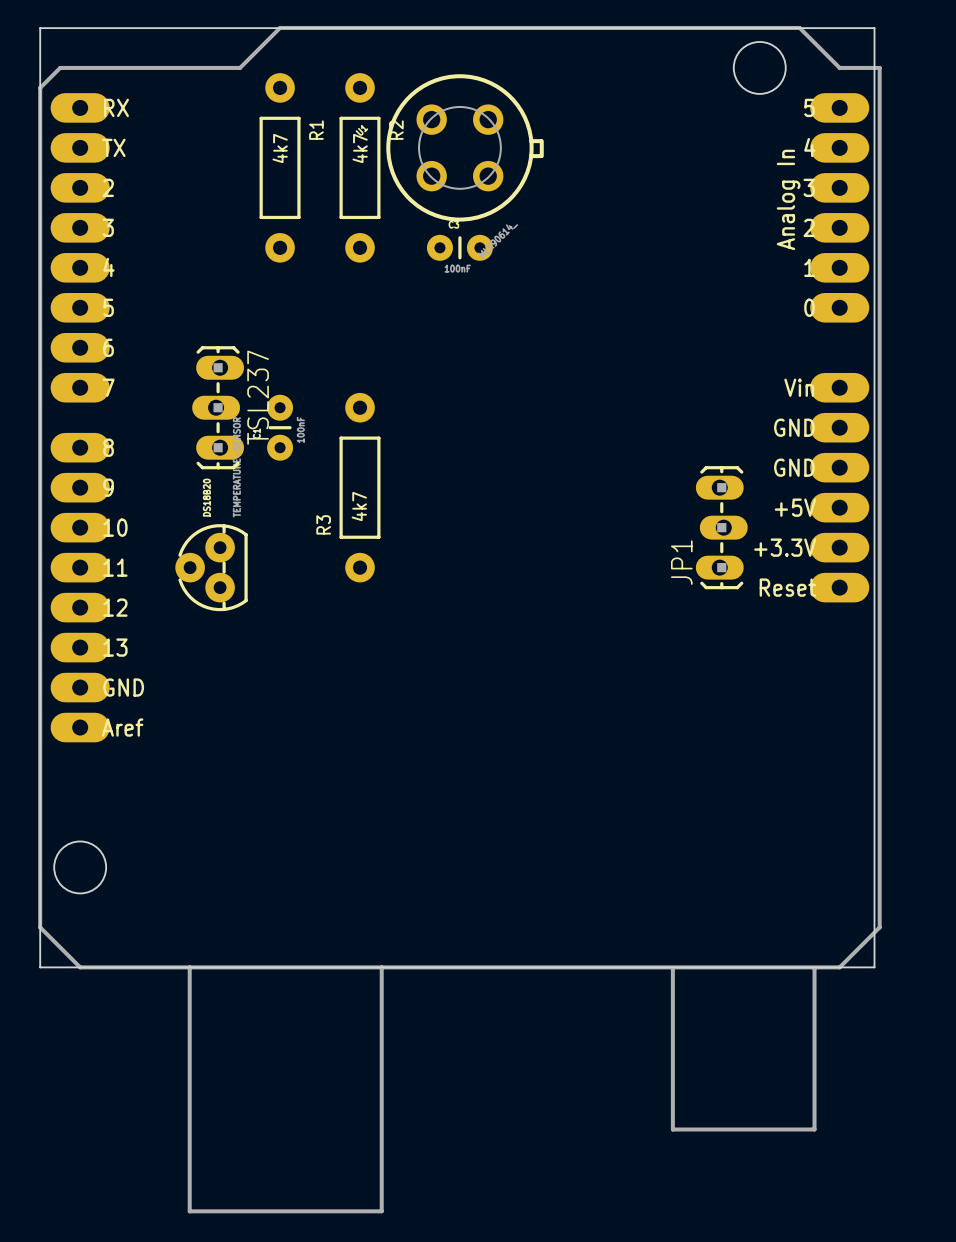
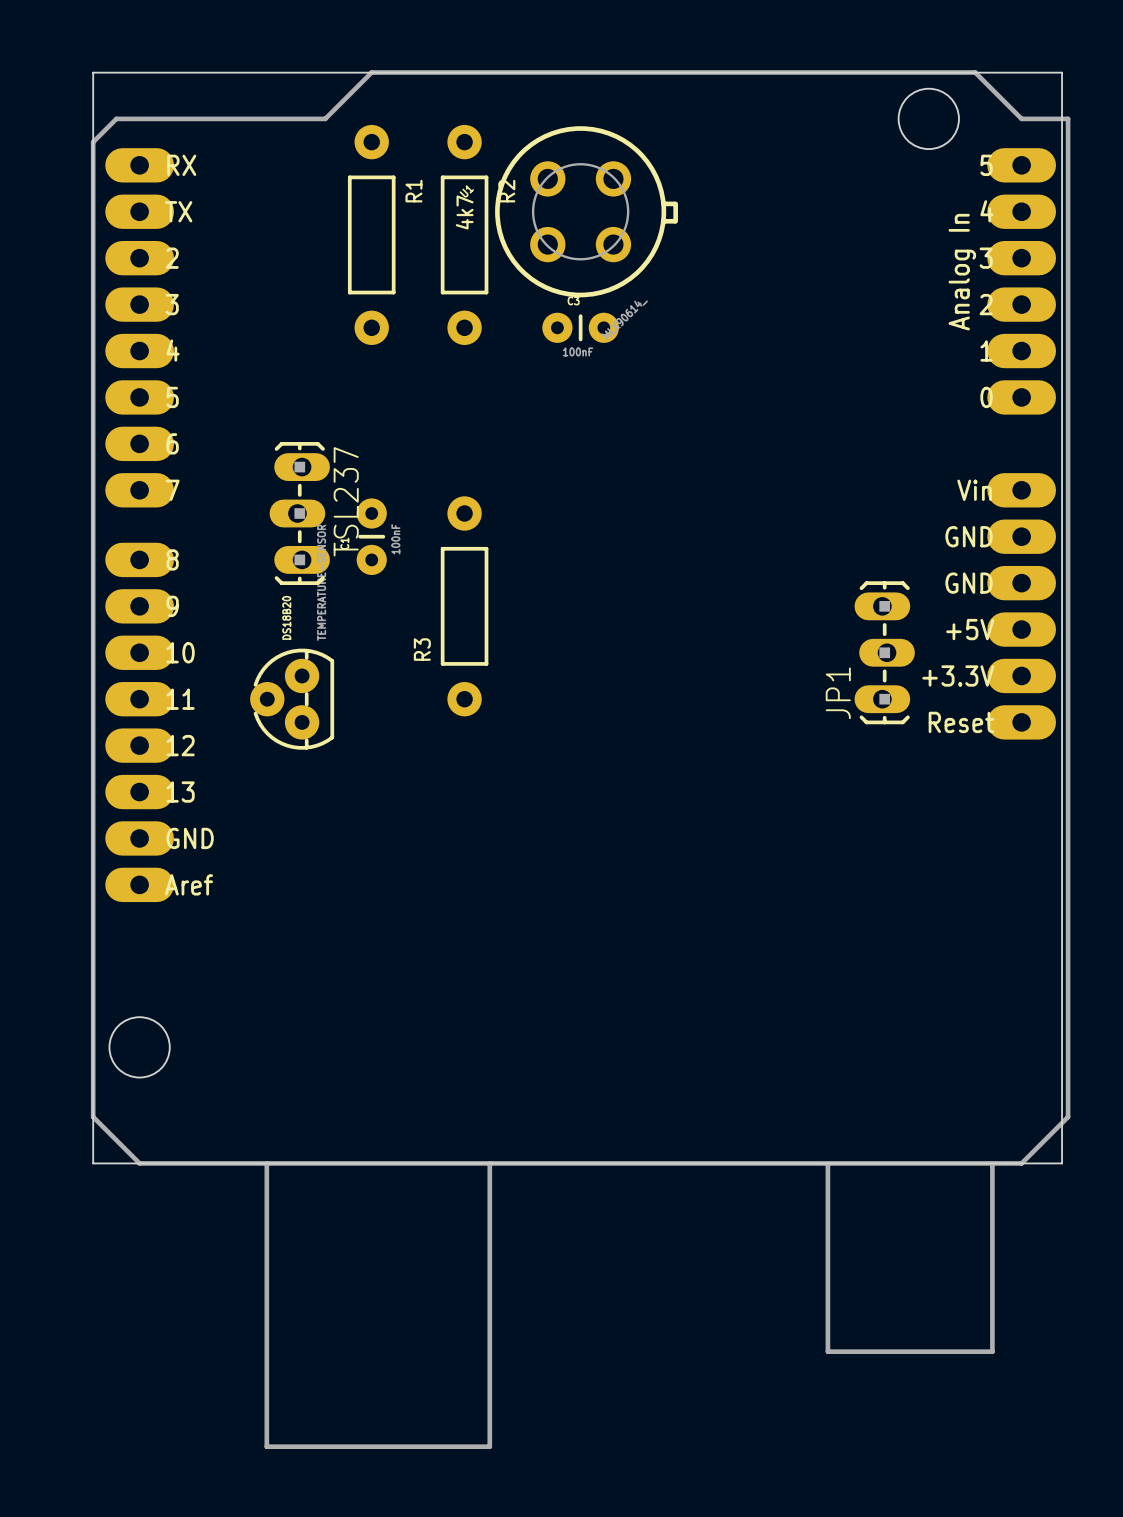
R1 value: 4k7 (280, 148) -> none
R3 value: 4k7 (359, 506) -> none

